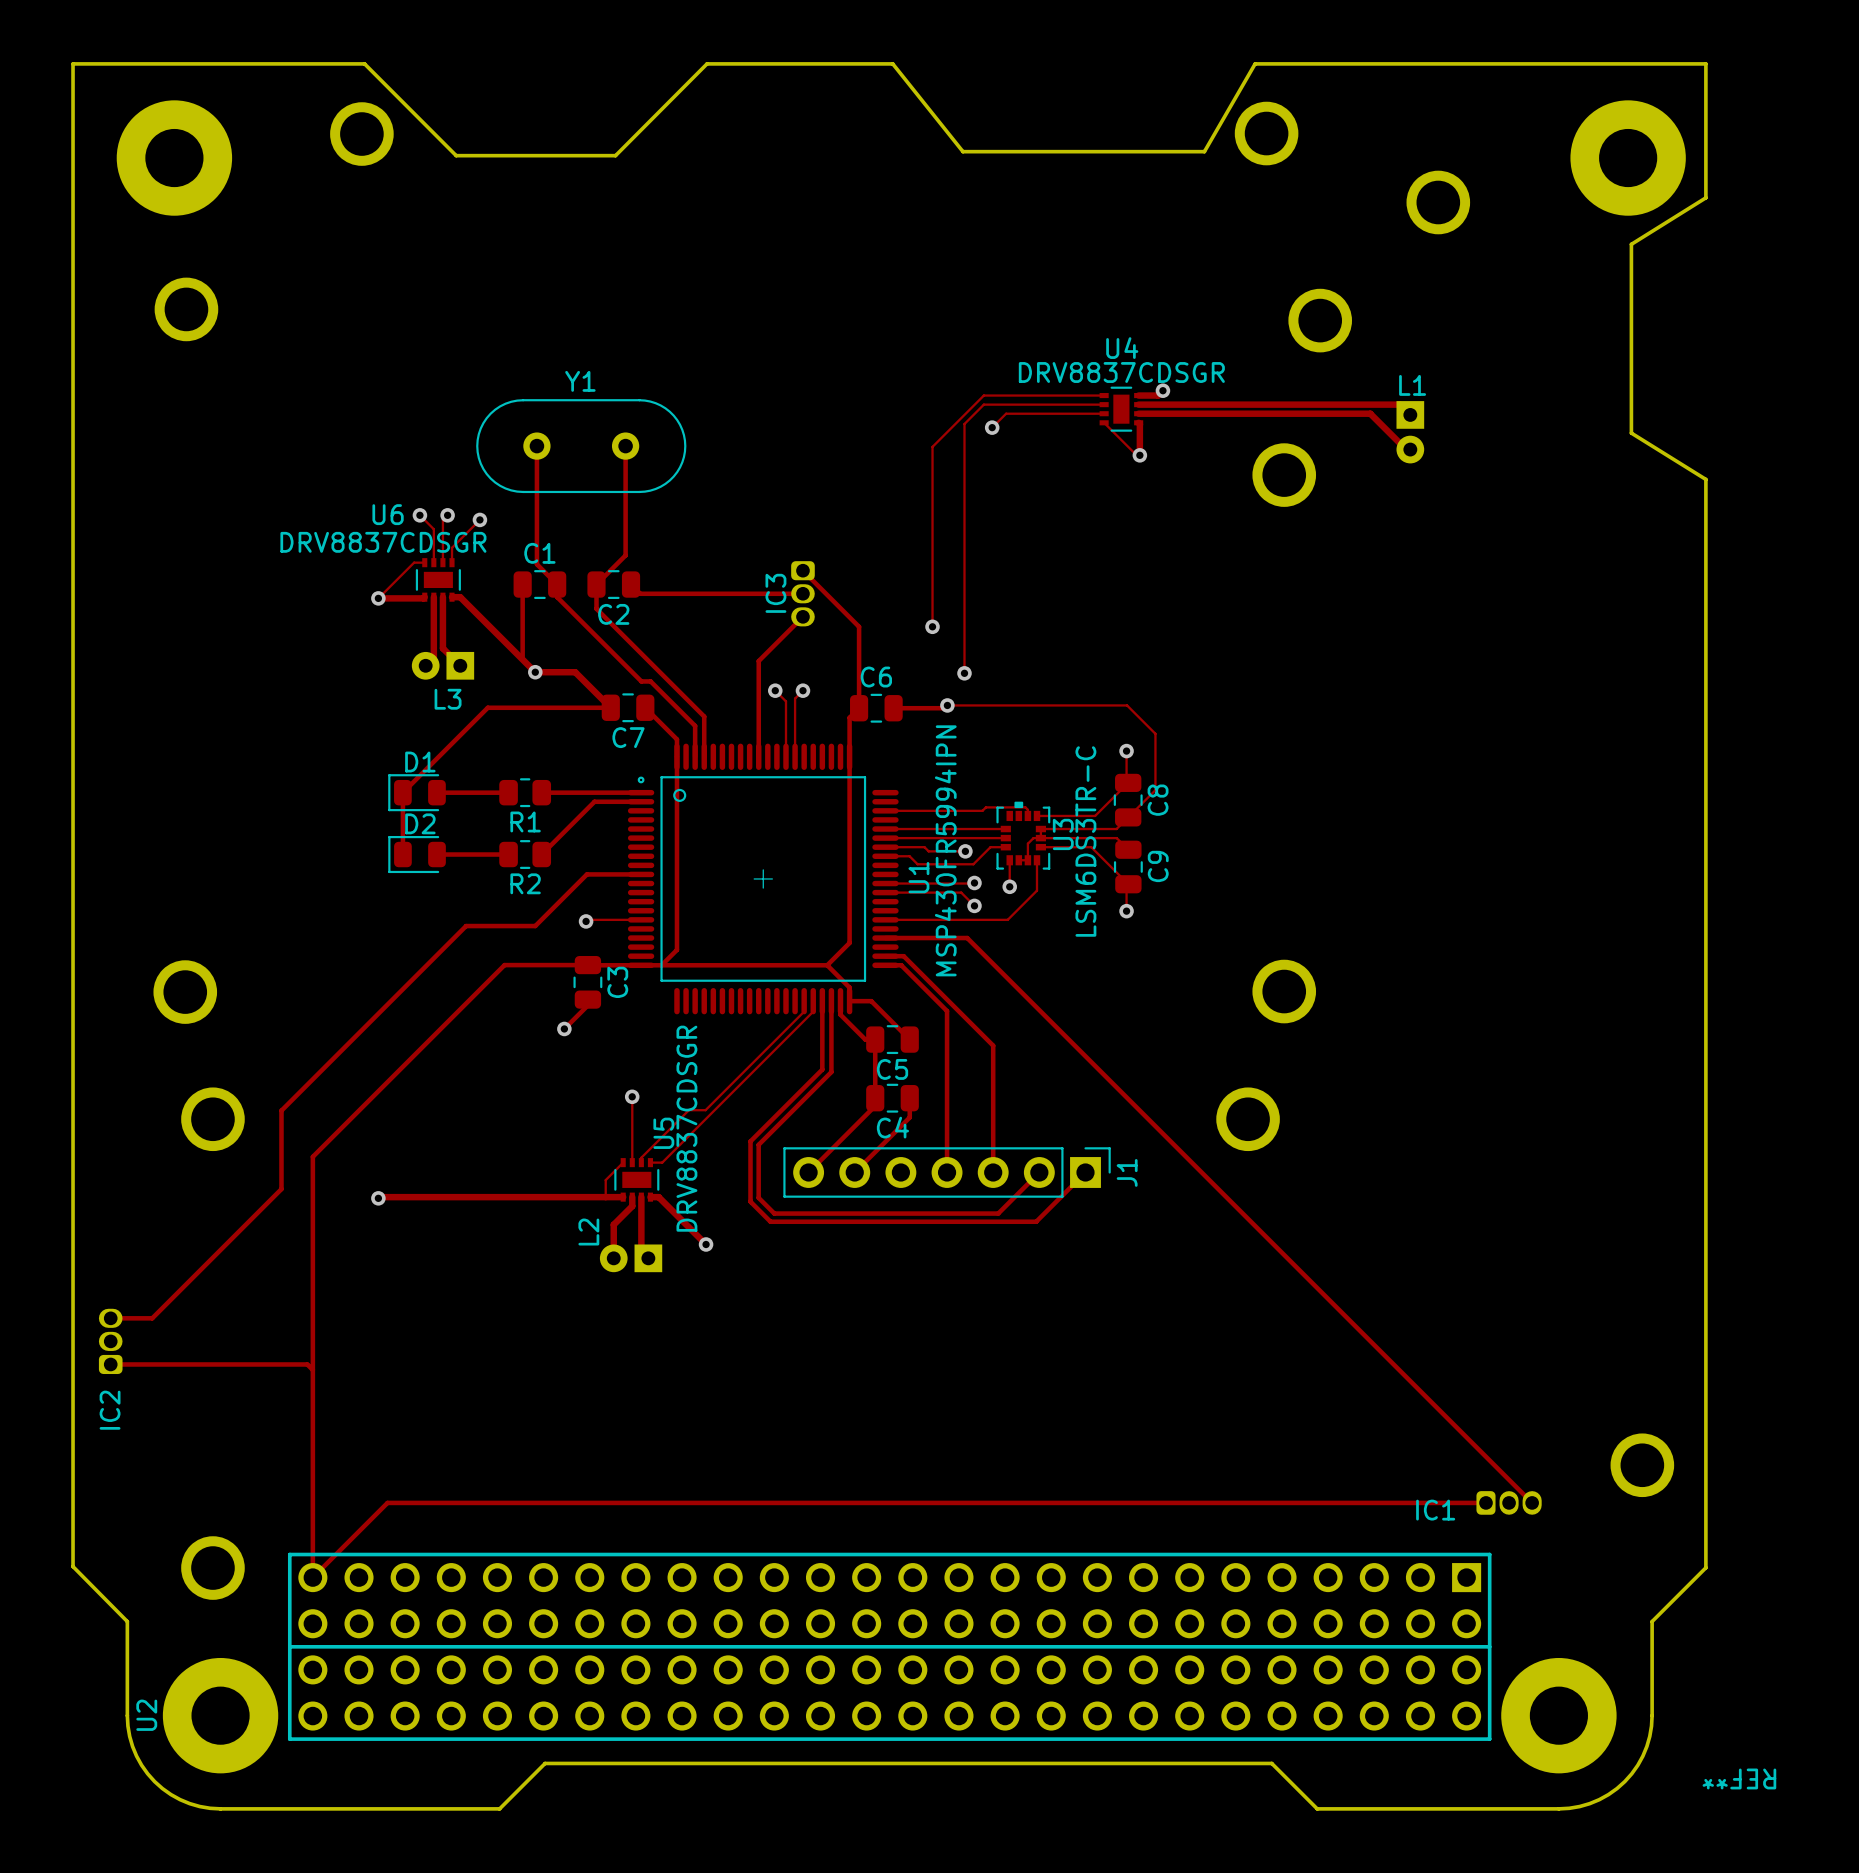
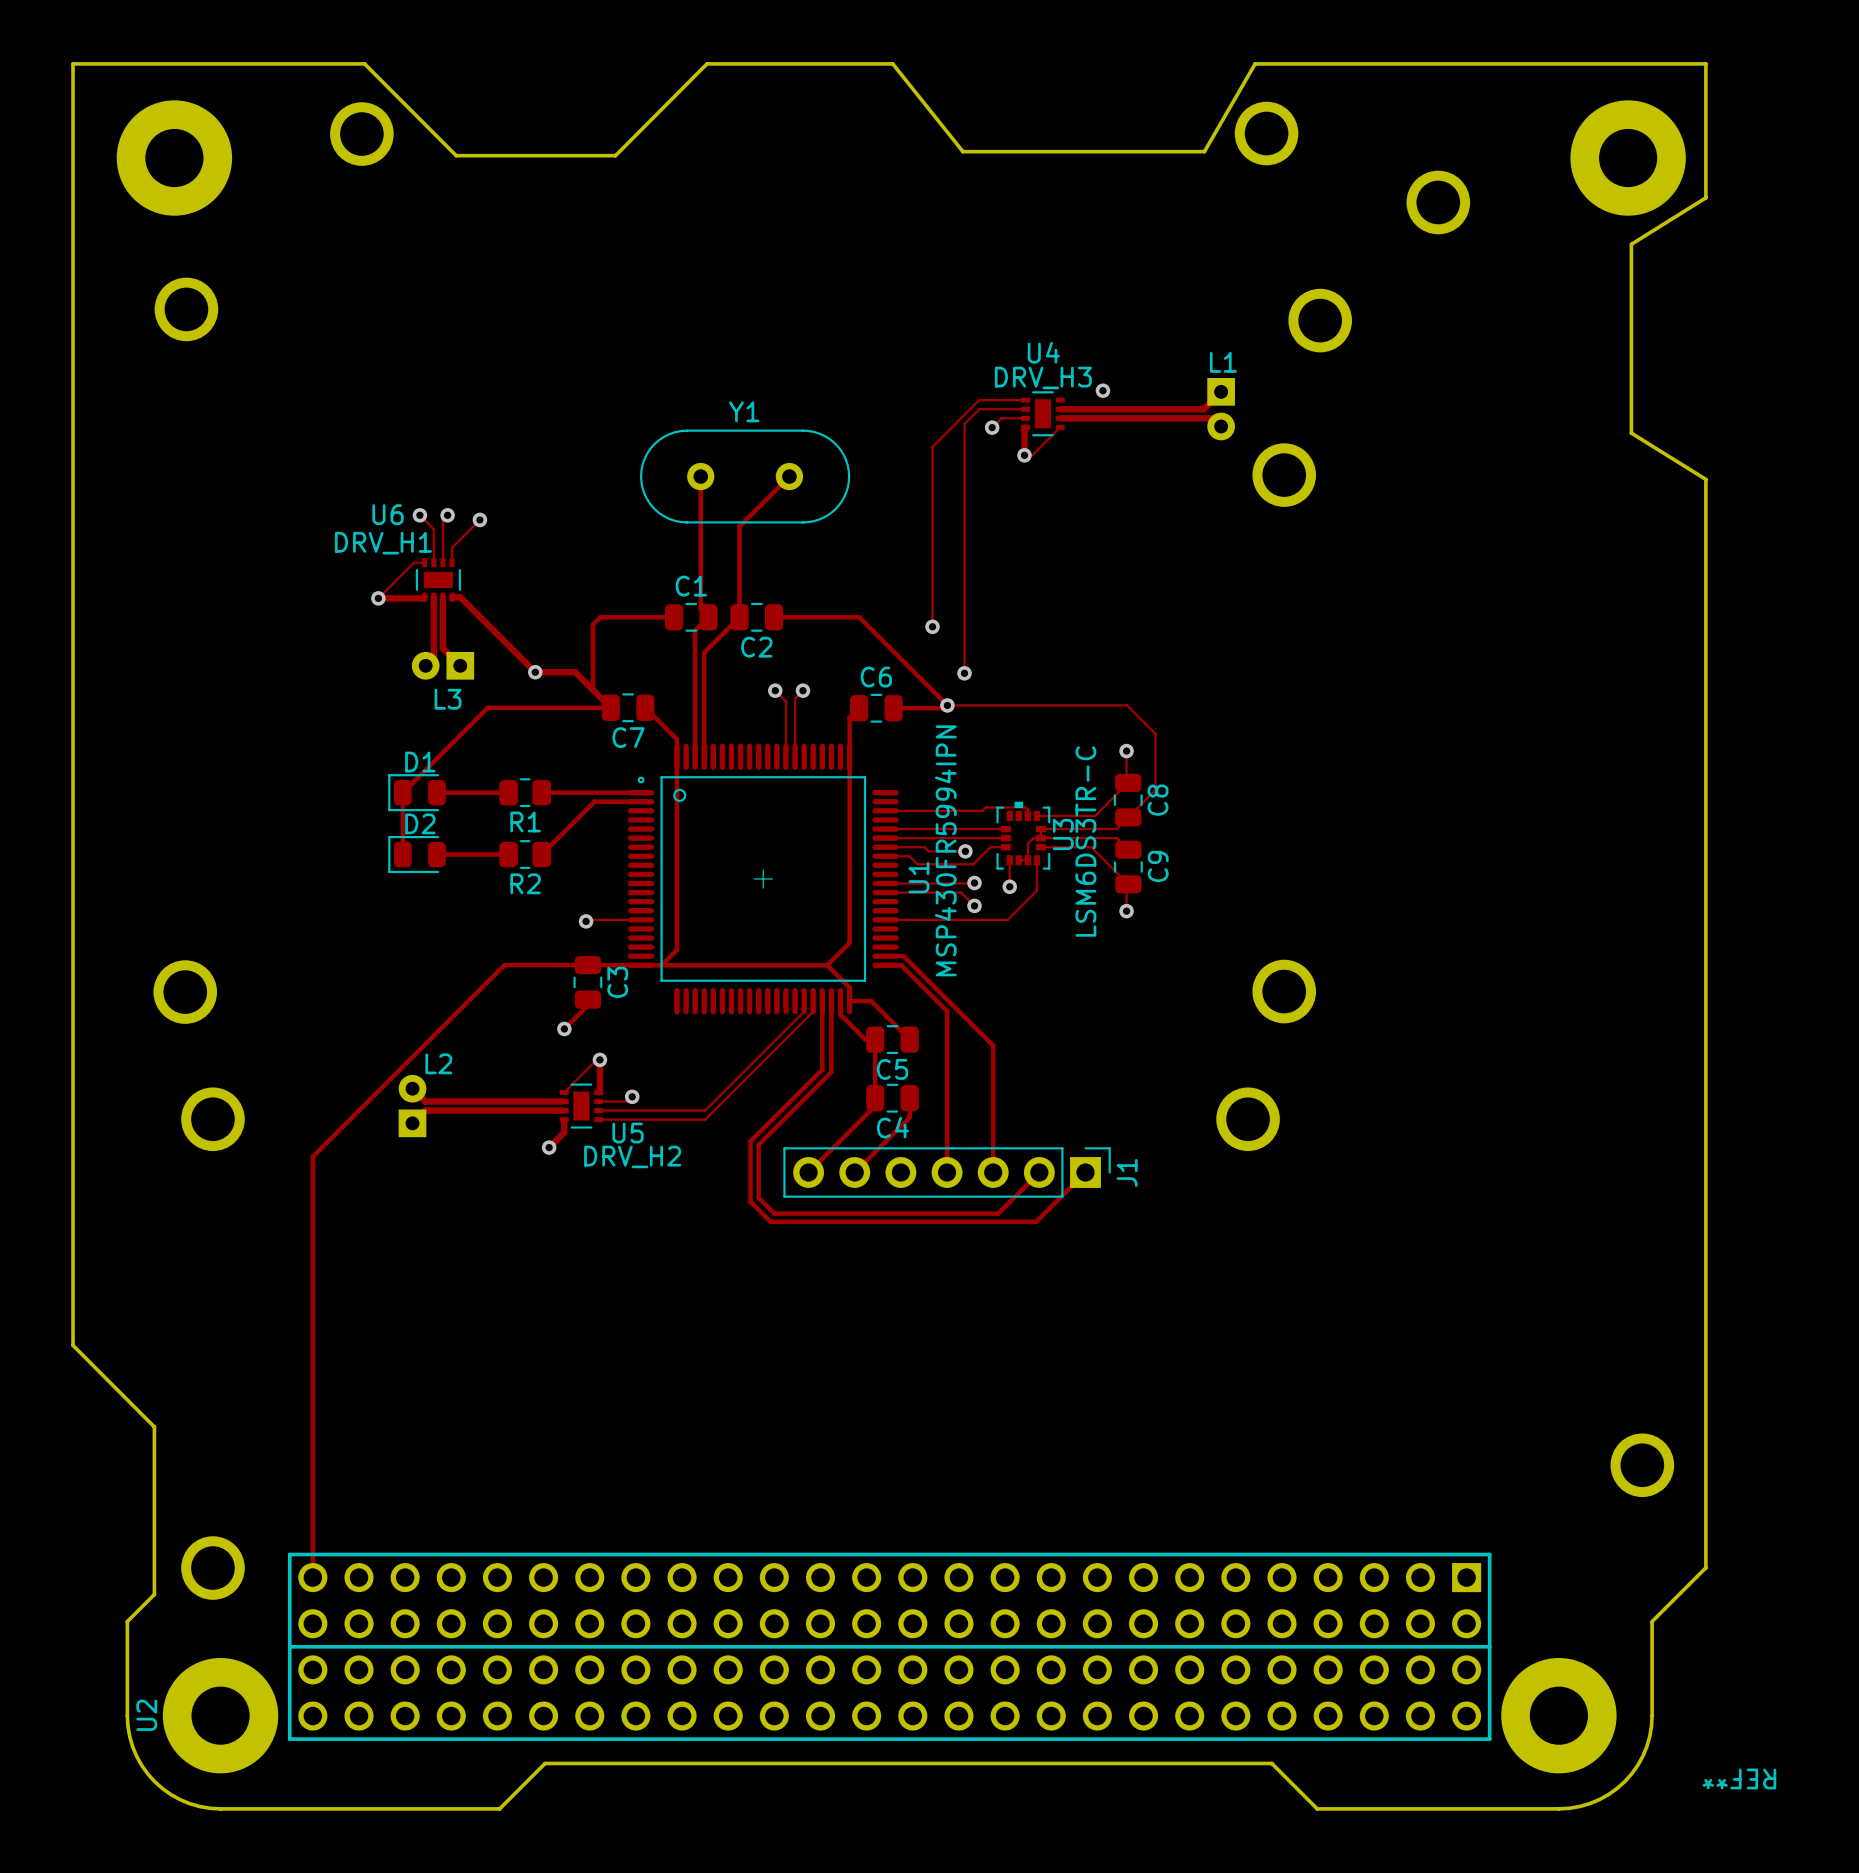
U2 footprint: [71, 62, 1708, 1811] -> [71, 62, 1708, 1811]
U4 value: DRV8837CDSGR (1121, 372) -> DRV_H3 (1043, 377)
via: none -> (1102, 390)
track: (1162, 390) (1158, 395) (1138, 395) -> none
via: (1162, 390) -> none
track: none -> (1221, 391) (1203, 409) (1060, 409)
track: (1104, 395) (983, 395) (979, 400) -> (1025, 400) (979, 400)
track: (1104, 404) (983, 404) (979, 409) -> (1025, 409) (979, 409)
track: (1138, 404) (1400, 404) (1410, 414) -> none
U4 position: (1121, 409) -> (1042, 413)
track: (1104, 413) (1006, 413) (1001, 418) -> (1025, 418) (1001, 418)
track: (1138, 413) (1370, 413) (1406, 449) (1410, 449) -> none
track: none -> (1060, 418) (1212, 418) (1221, 426)
track: (1104, 422) (1136, 455) (1139, 455) (1138, 422) -> none
track: none -> (1025, 427) (1024, 455) (1032, 455) (1060, 427)
L1 position: (1410, 432) -> (1221, 409)
track: (536, 446) (536, 564) (557, 584) (557, 597) (641, 681) (650, 681) (695, 725) -> (700, 476) (700, 609) (708, 617) (695, 630) (695, 725)
Y1 position: (581, 446) -> (745, 476)
track: (625, 446) (625, 555) (596, 584) (596, 608) (704, 716) -> (789, 476) (739, 526) (739, 617) (704, 652) (704, 716)
via: none -> (1024, 455)
via: (1139, 455) -> none
U6 value: DRV8837CDSGR (383, 542) -> DRV_H1 (383, 543)
track: (802, 570) (859, 626) (859, 708) -> none
track: (522, 584) (522, 659) (535, 672) -> none
C1 position: (539, 584) -> (691, 617)
C2 position: (613, 584) -> (756, 617)
track: (631, 584) (640, 593) (802, 593) -> none
IC3: (802, 593) -> none
track: (802, 616) (758, 661) (758, 756) -> none
track: none -> (674, 617) (600, 617) (592, 624) (592, 689)
track: none -> (774, 617) (859, 617) (947, 705)
track: (641, 874) (586, 874) (535, 926) (466, 926) (281, 1110) (281, 1189) (152, 1318) (110, 1318) -> none
track: (885, 938) (967, 938) (1532, 1502) -> none
via: none -> (599, 1059)
track: none -> (412, 1088) (425, 1101) (564, 1101)
track: none -> (564, 1092) (596, 1059) (599, 1059) (598, 1092)
track: (632, 1096) (632, 1162) -> (632, 1096) (627, 1101) (598, 1101)
track: none -> (564, 1110) (425, 1110) (412, 1123)
track: (705, 1110) (688, 1110) (641, 1157) (641, 1162) -> (705, 1110) (598, 1110)
track: none -> (564, 1119) (564, 1132) (549, 1147)
track: (705, 1119) (662, 1162) (650, 1162) -> (705, 1119) (598, 1119)
U5 value: DRV8837CDSGR (686, 1128) -> DRV_H2 (632, 1156)
via: none -> (549, 1147)
track: (623, 1162) (605, 1180) (605, 1197) -> none
U5 rotation: 0° (636, 1179) -> 90° clockwise (581, 1106)
U5 position: (636, 1179) -> (581, 1106)
track: (623, 1197) (378, 1198) -> none
track: (632, 1197) (632, 1206) (613, 1224) (613, 1258) -> none
track: (641, 1197) (641, 1251) (648, 1258) -> none
track: (650, 1197) (658, 1197) (706, 1244) -> none
via: (378, 1198) -> none
via: (706, 1244) -> none
L2 rotation: 0° (631, 1258) -> 90° clockwise (412, 1106)
L2 position: (631, 1258) -> (412, 1106)
IC2: (110, 1341) -> none
track: (110, 1364) (307, 1364) (312, 1370) -> none
track: (1485, 1502) (387, 1502) (312, 1577) -> none
IC1: (1509, 1502) -> none

